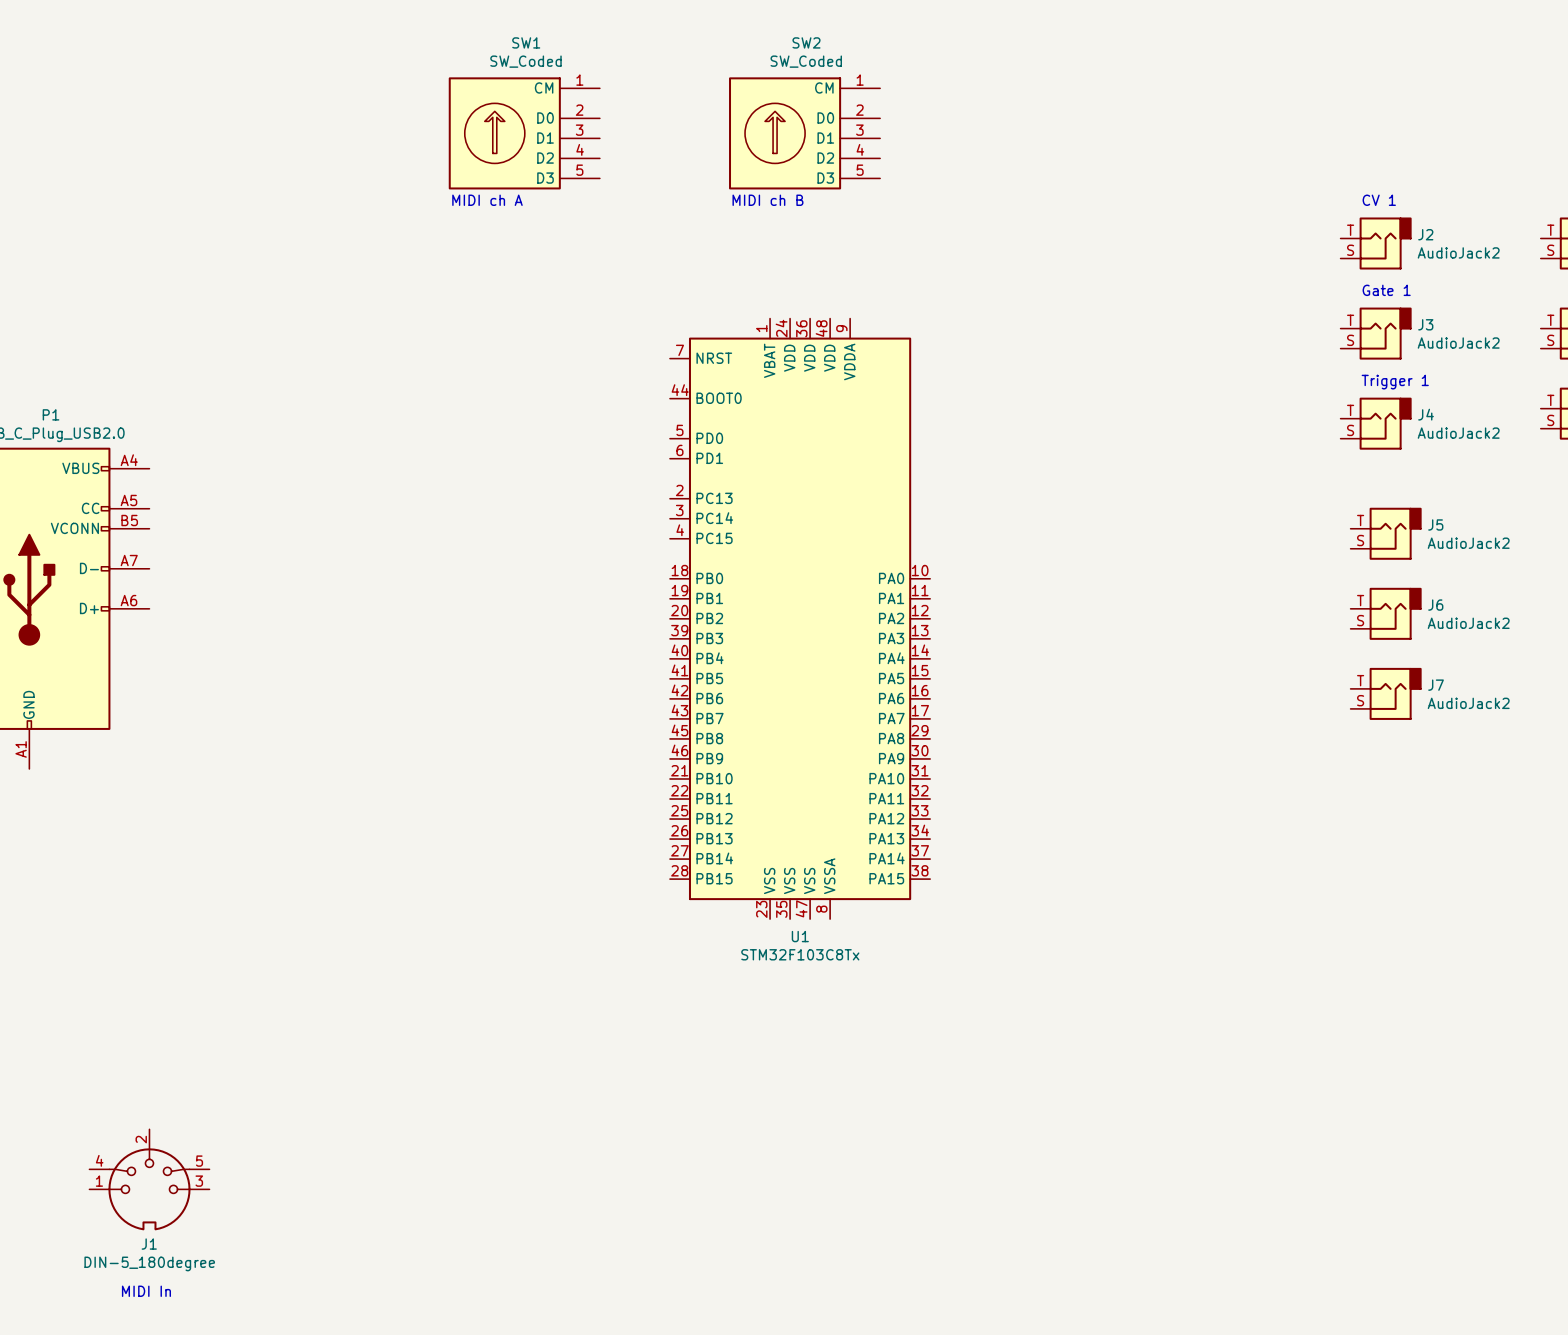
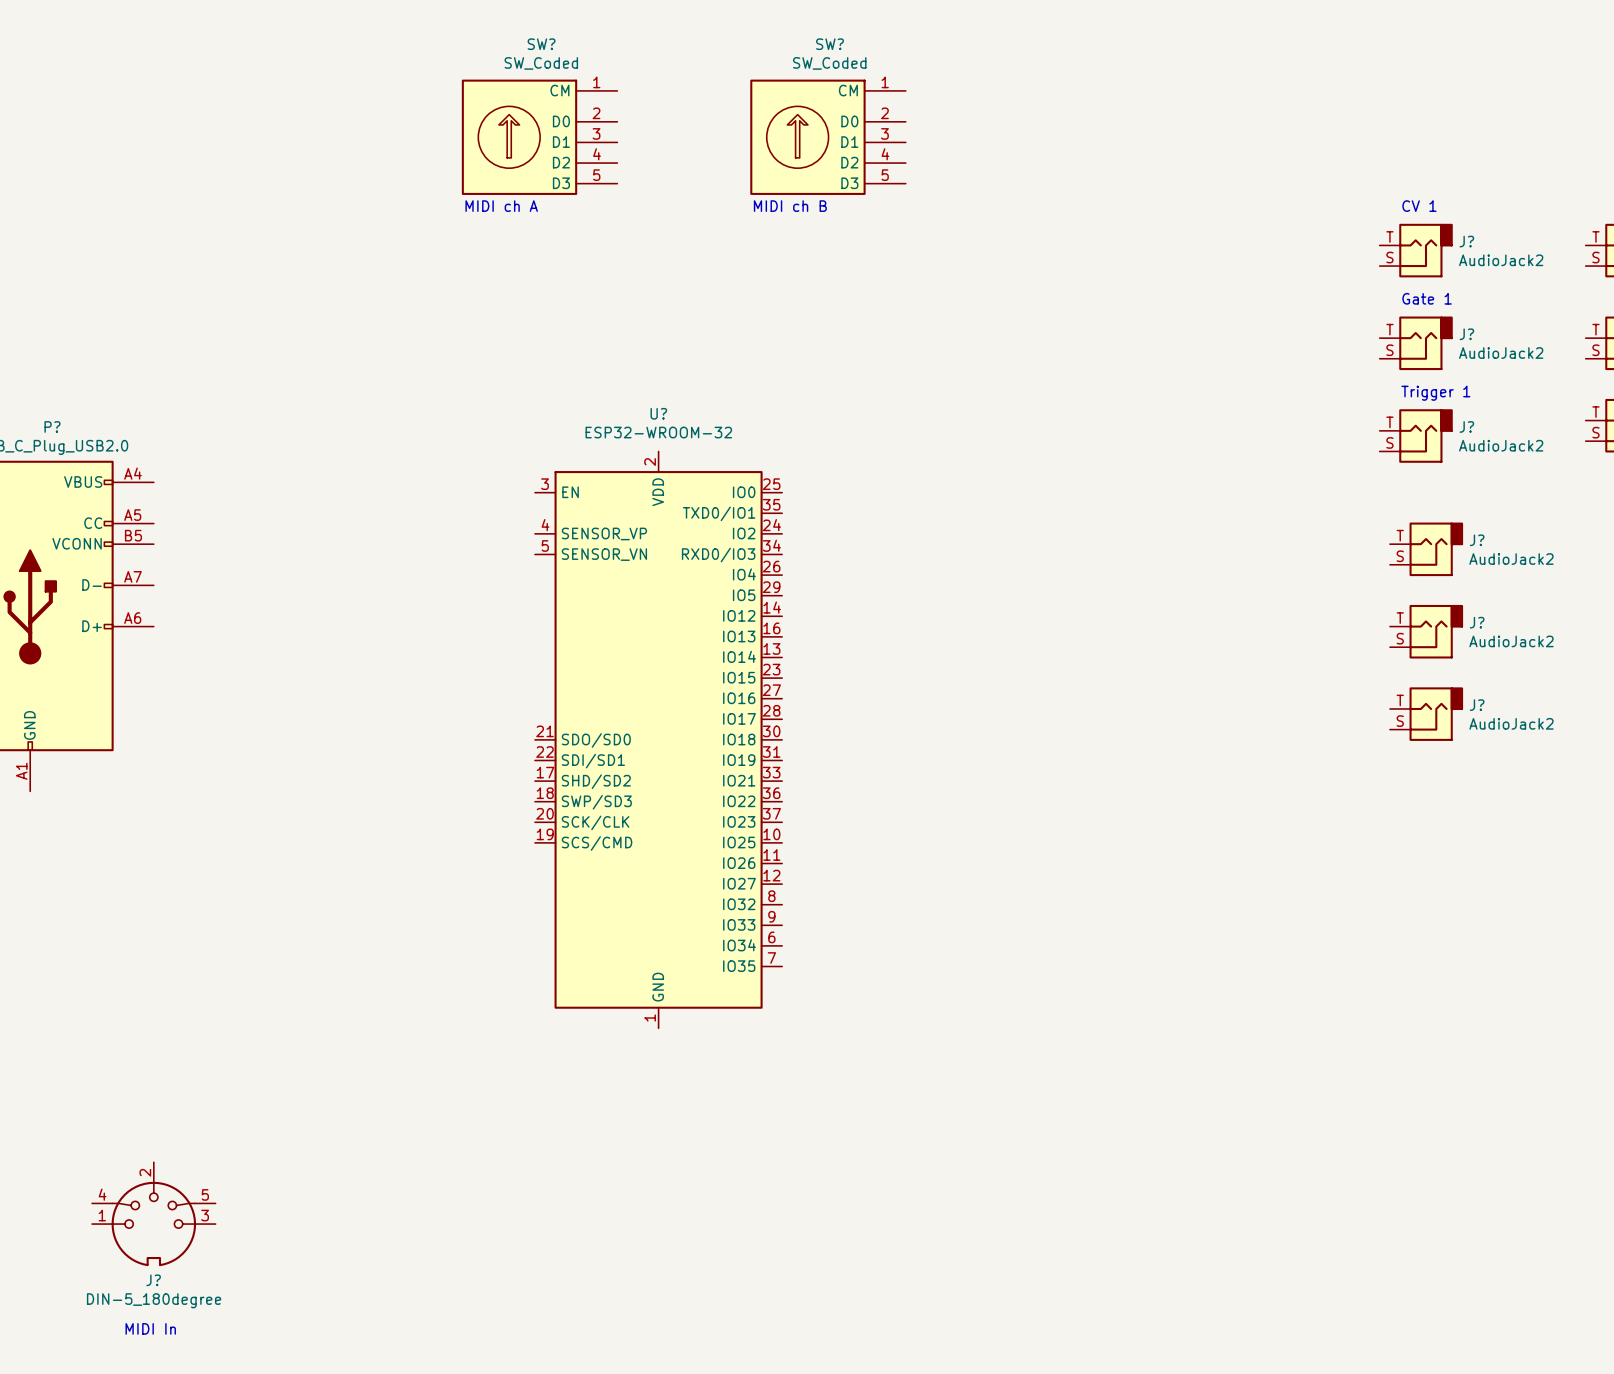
SW1 name: SW1 (526, 42) -> SW? (541, 44)
SW2 name: SW2 (806, 42) -> SW? (829, 44)
J2 name: J2 (1425, 234) -> J? (1466, 241)
J3 name: J3 (1425, 324) -> J? (1466, 334)
P1 name: P1 (51, 414) -> P? (52, 426)
J4 name: J4 (1426, 414) -> J? (1466, 426)
J5 name: J5 (1435, 524) -> J? (1477, 540)
J6 name: J6 (1435, 605) -> J? (1477, 622)
U1: STM32F103C8Tx (800, 618) -> none
J7 name: J7 (1436, 685) -> J? (1477, 705)
U?: none -> ESP32-WROOM-32 (658, 739)
J1 name: J1 (149, 1244) -> J? (153, 1280)

